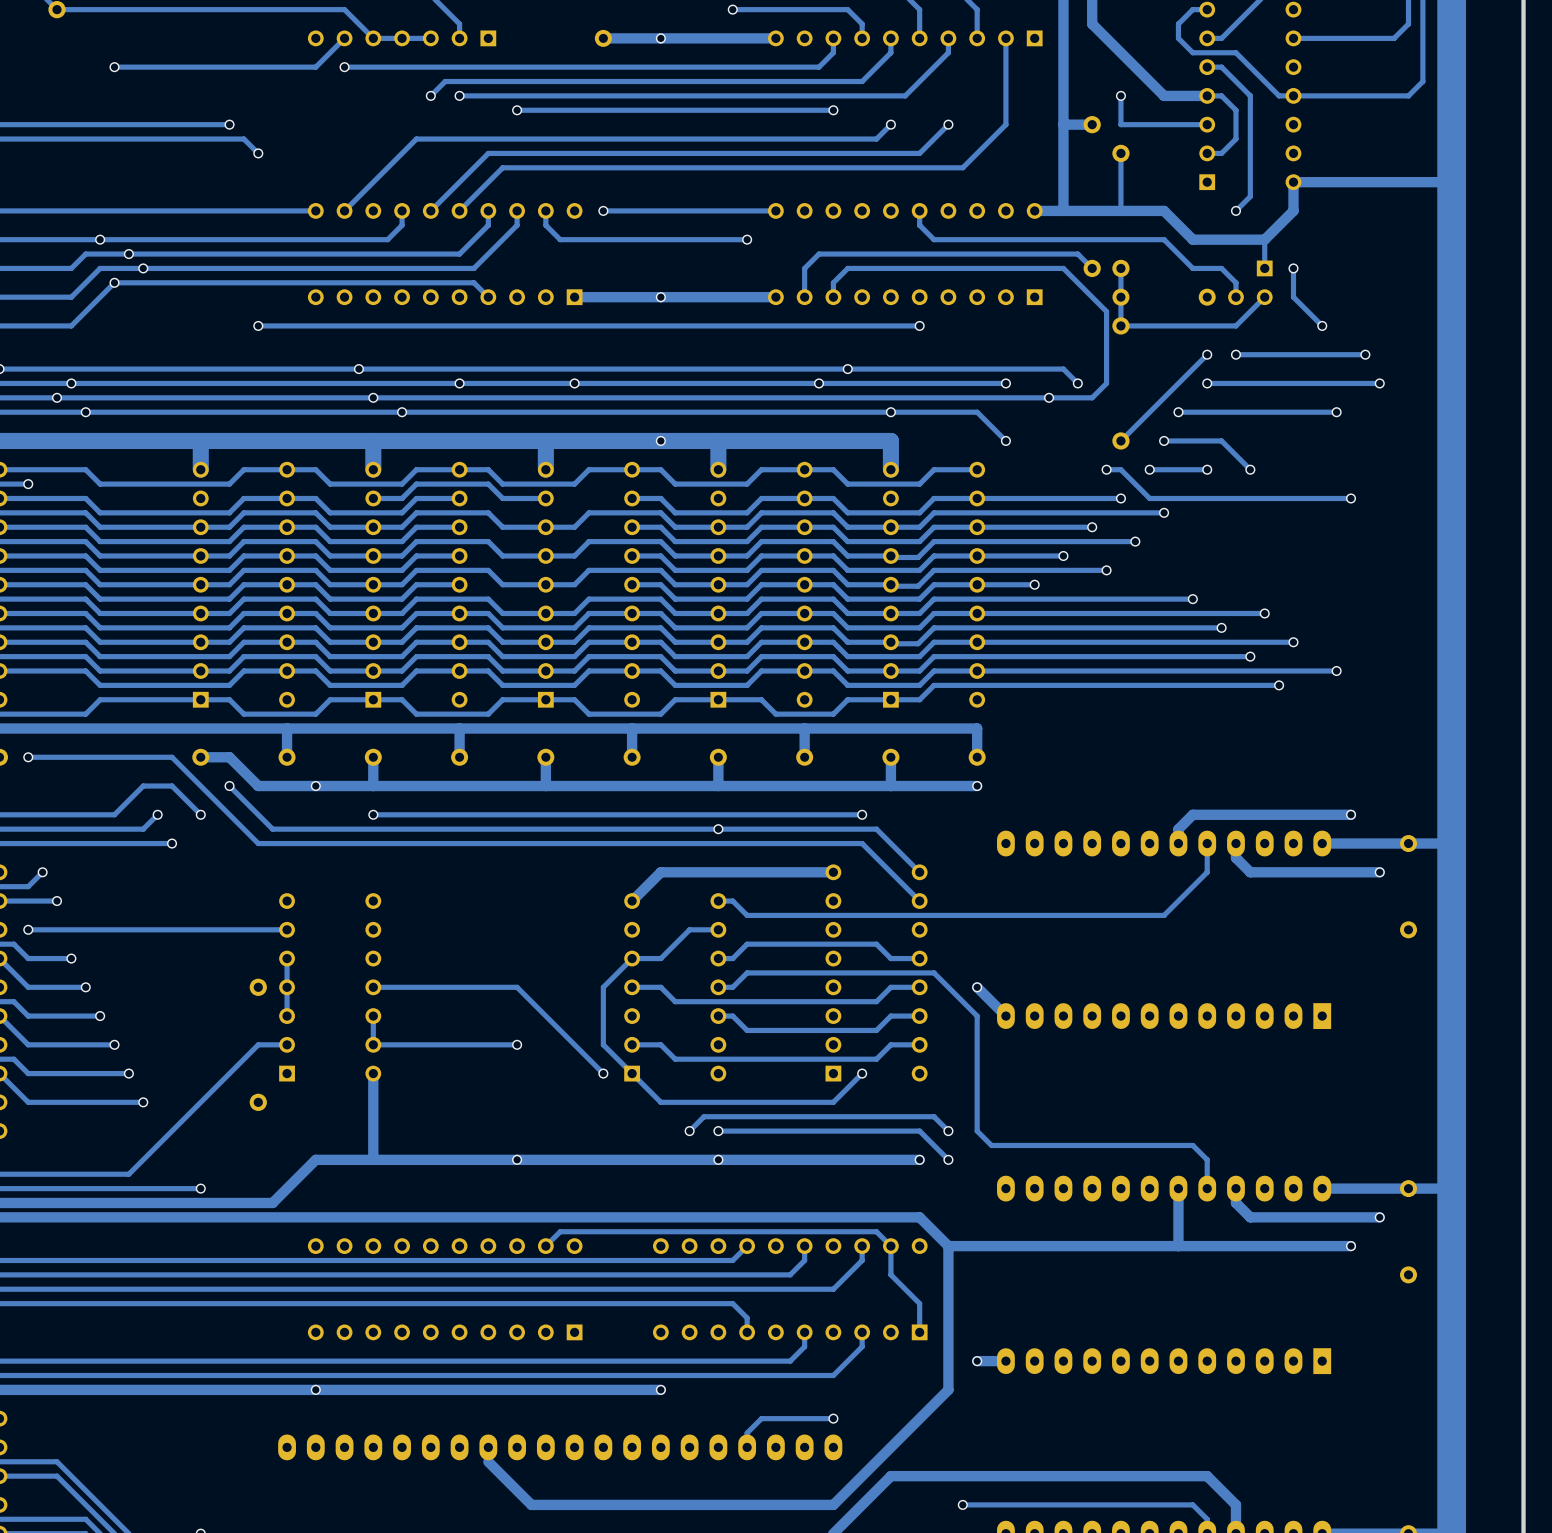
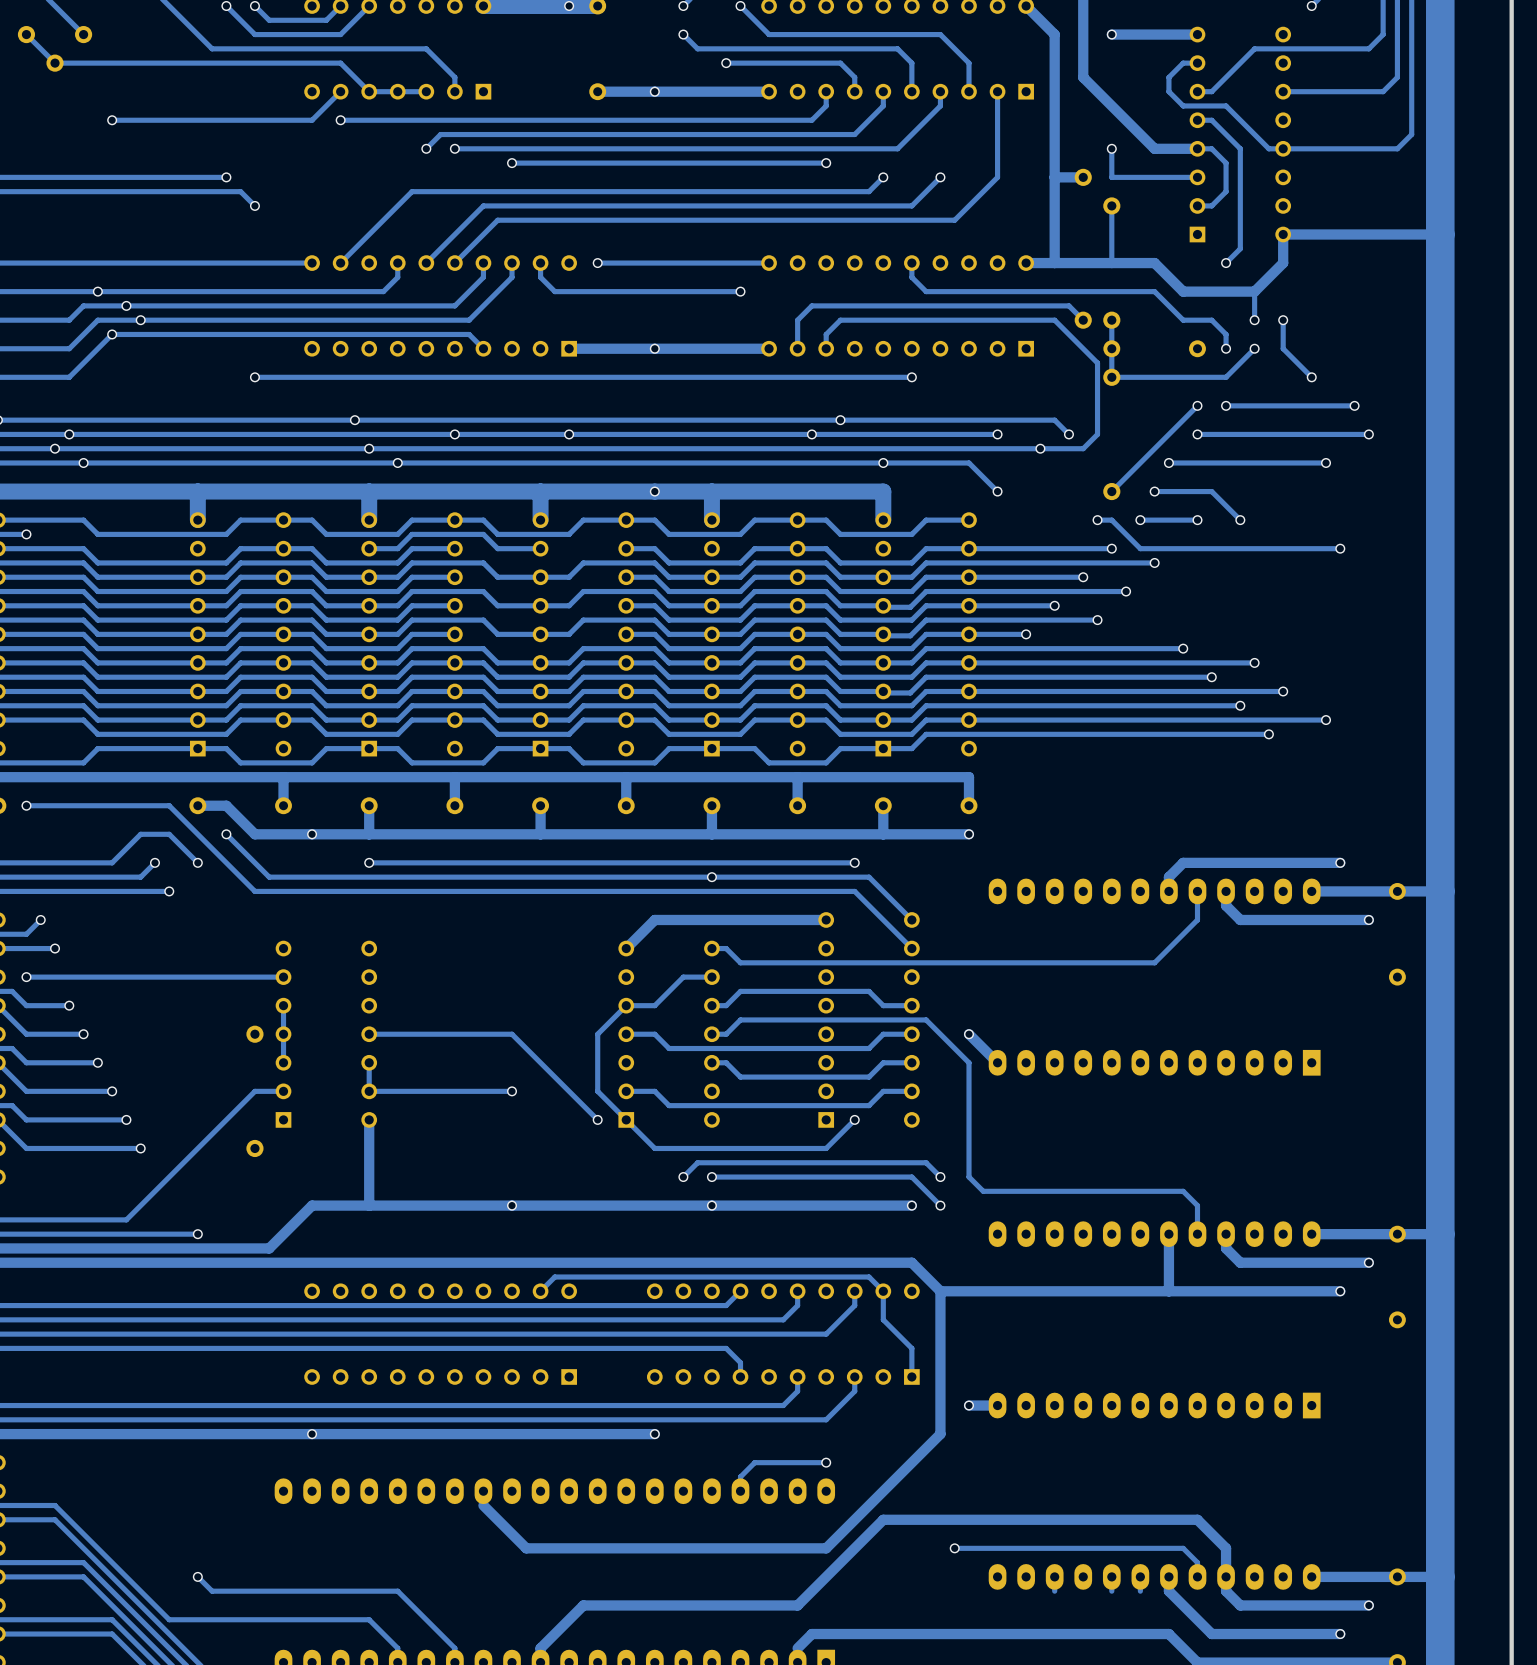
via: none -> (1254, 320)
part: (1250, 282) -> none
via: none -> (1226, 348)
via: none -> (1254, 348)

